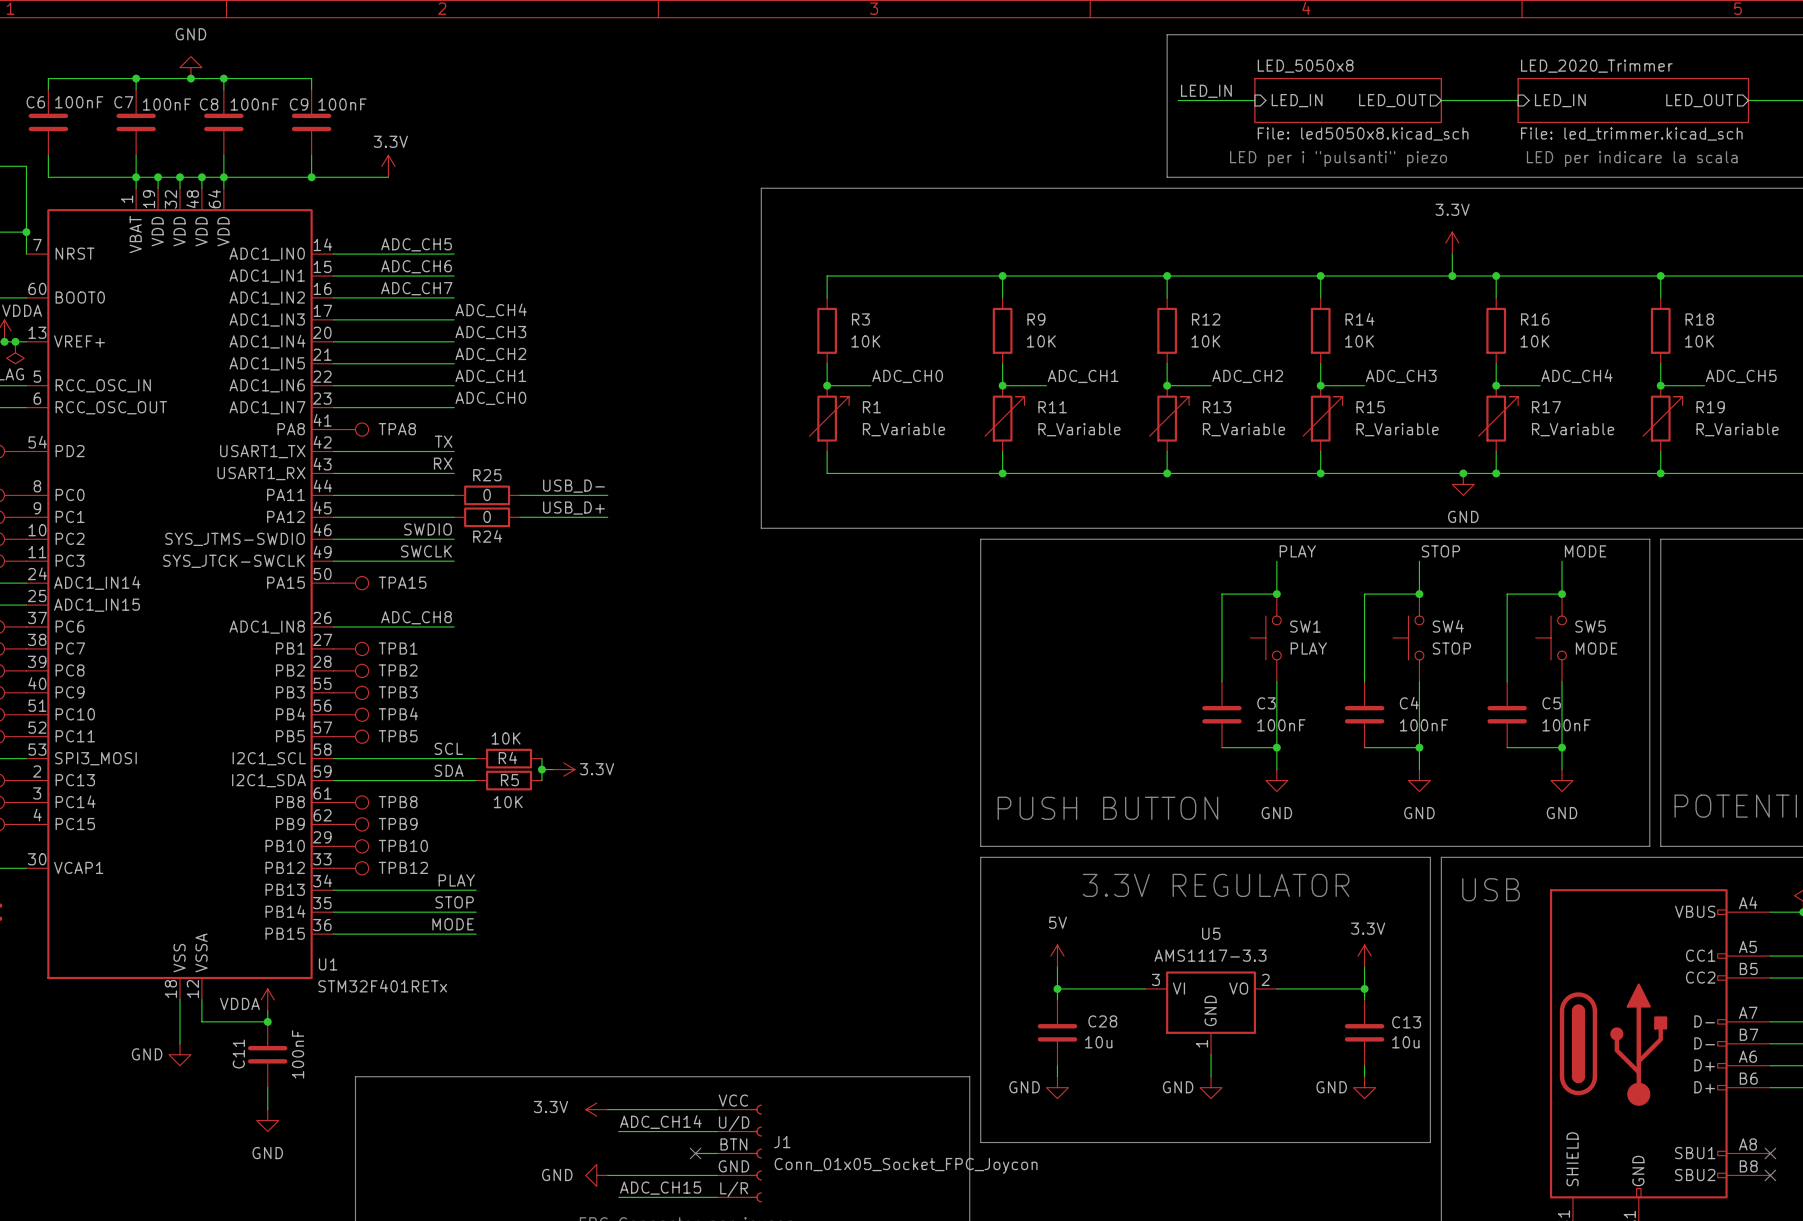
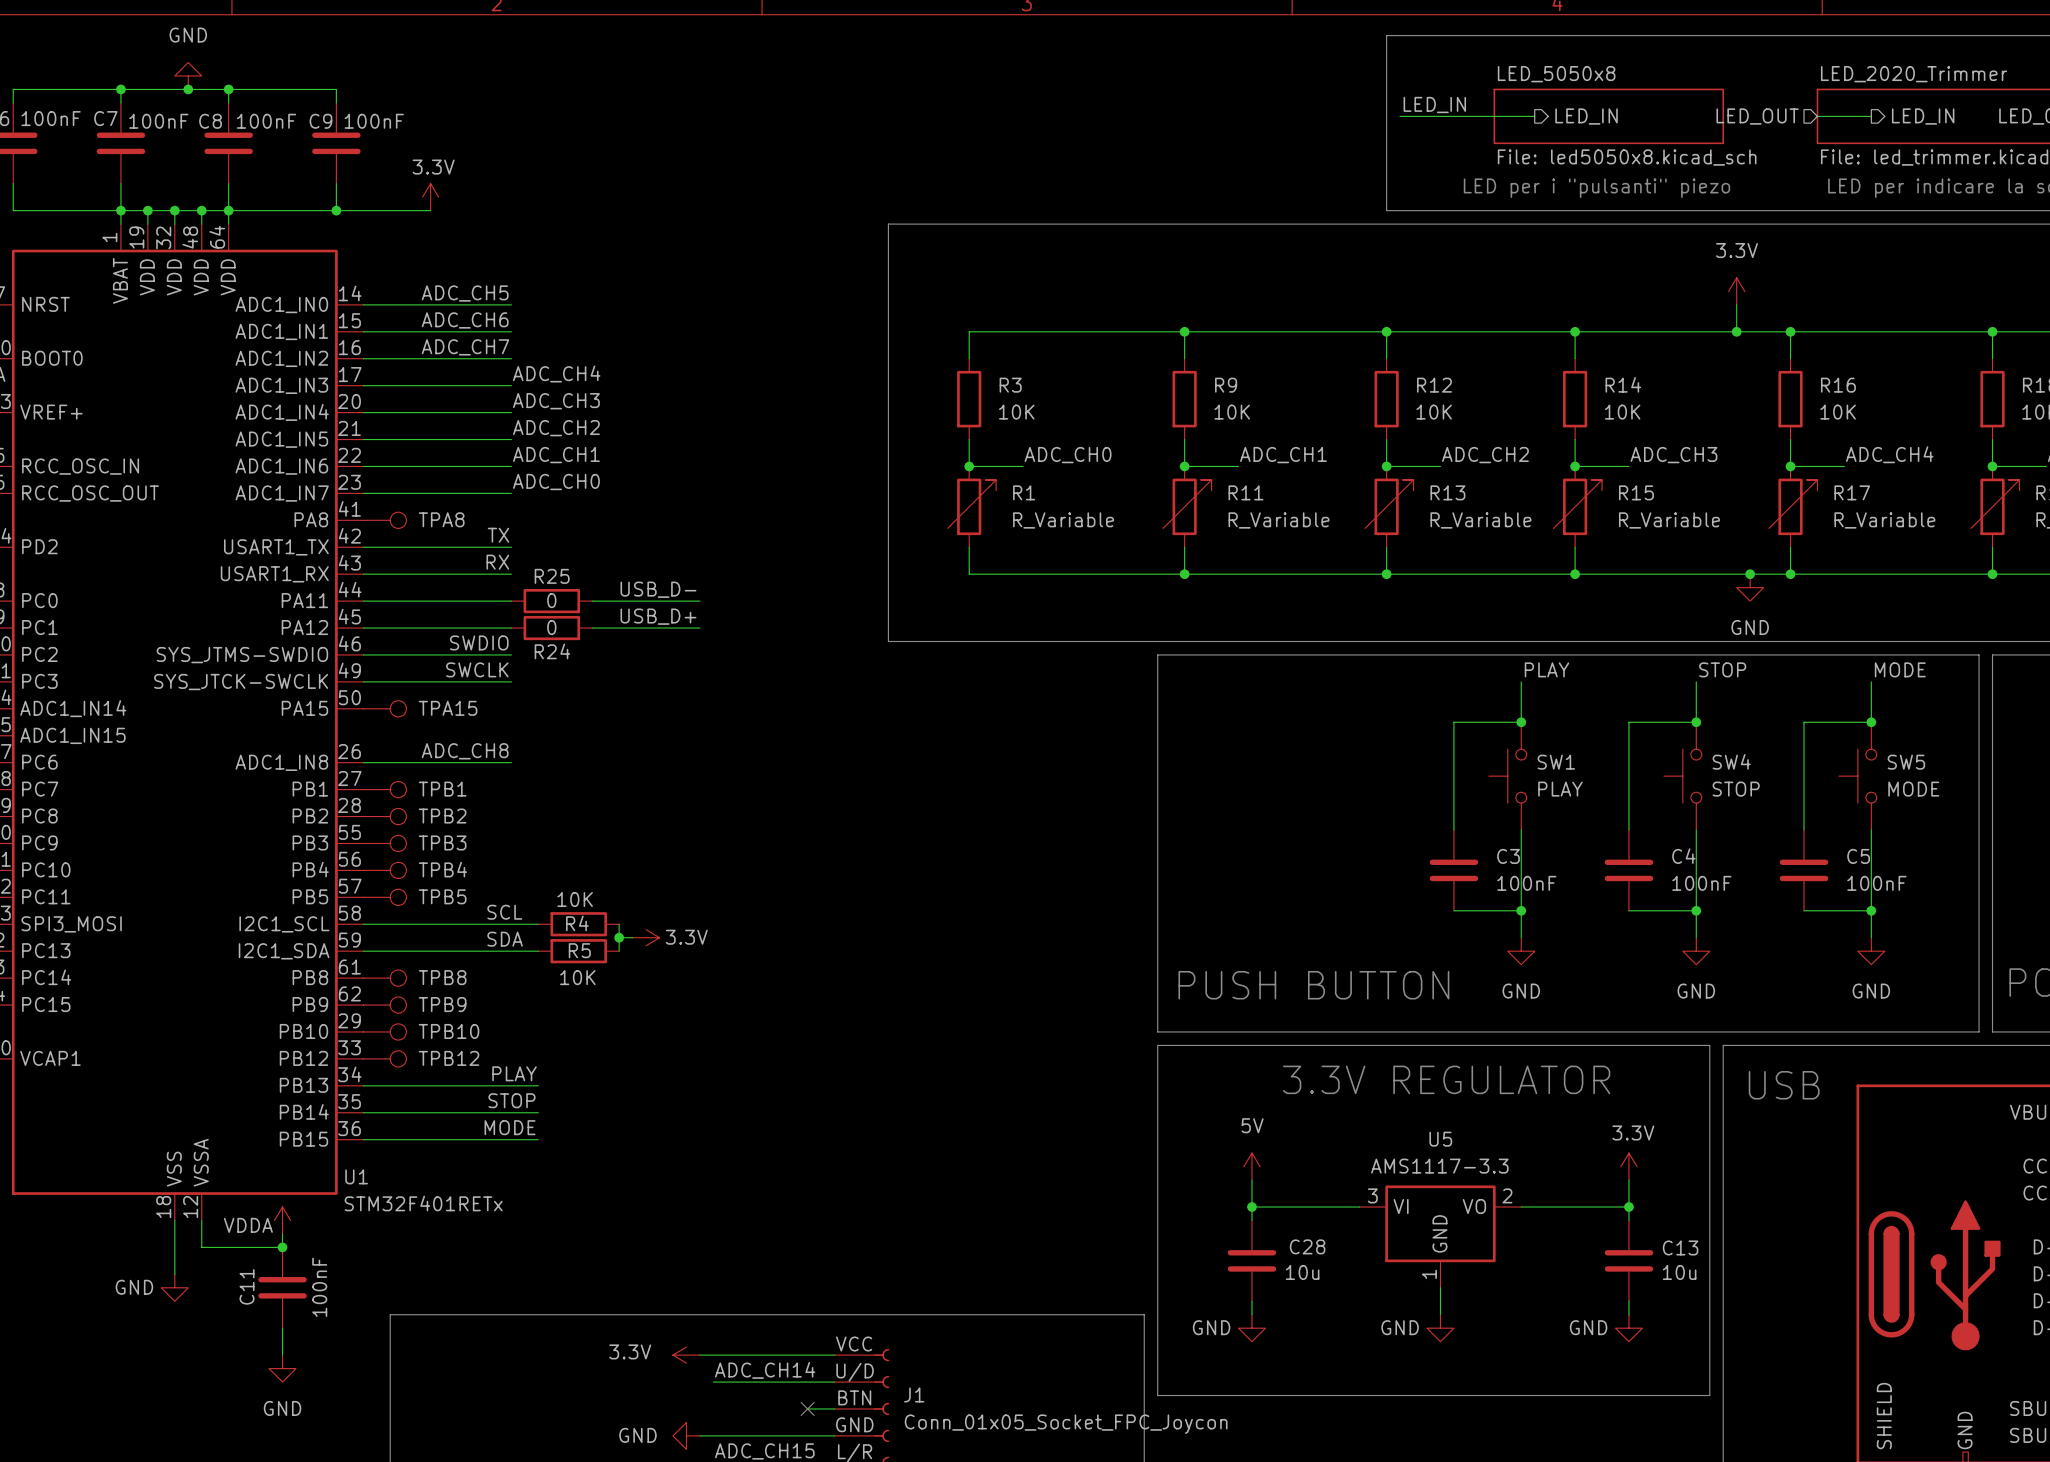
wire: none -> (1494, 116) (1534, 116)
sheet pin position: LED_IN (1297, 100) -> LED_IN (1586, 116)
sheet pin position: LED_OUT (1392, 100) -> LED_OUT (1757, 116)
wire: (1441, 100) (1518, 100) -> (1871, 116) (1817, 116)
sheet pin position: LED_IN (1560, 100) -> LED_IN (1923, 116)

